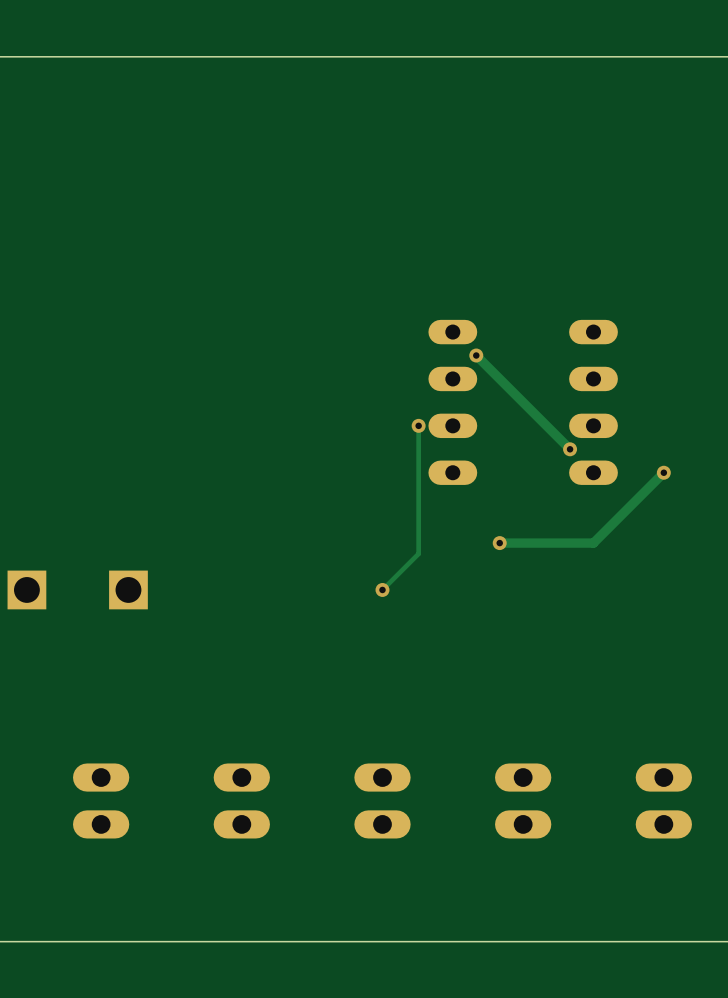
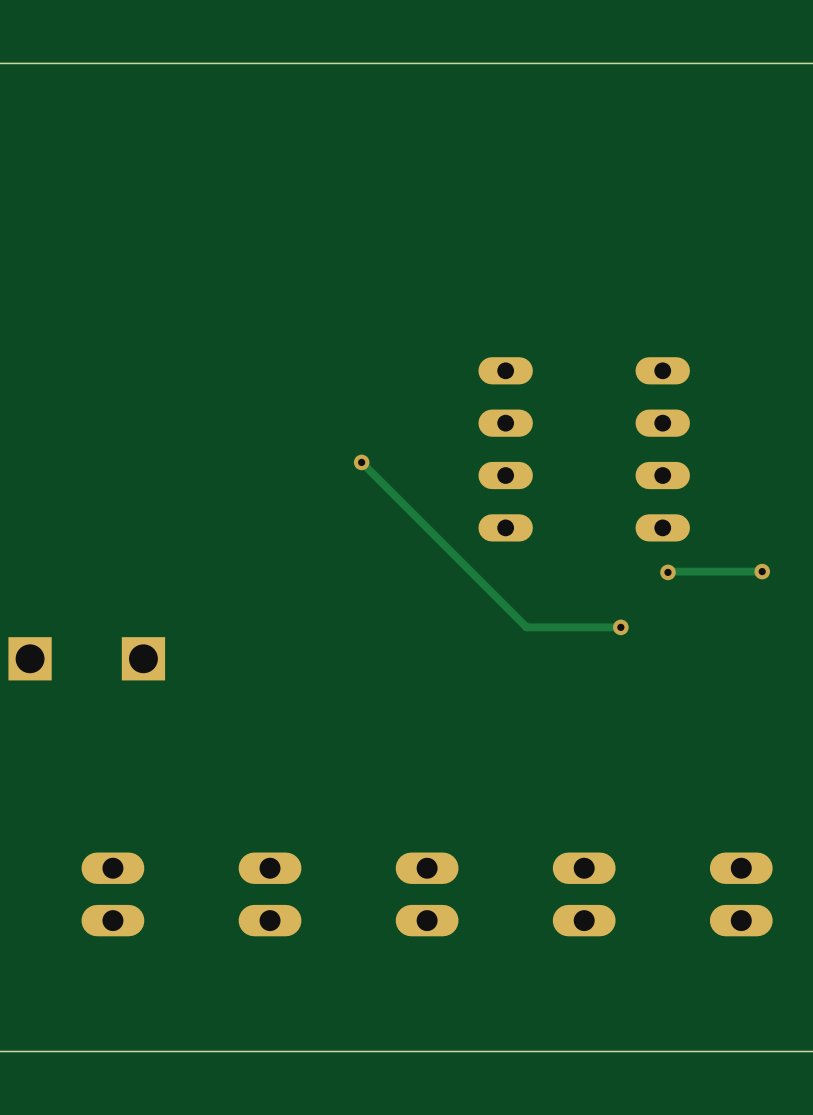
track: (476, 355) (570, 449) -> none
via: (476, 355) -> none
track: none -> (361, 462) (526, 627) (620, 627)
via: none -> (361, 462)
track: (418, 425) (418, 553) (382, 589) -> none
via: (418, 425) -> none
via: (570, 449) -> none
track: (663, 472) (593, 543) (499, 543) -> none
via: (663, 472) -> none
track: none -> (762, 571) (667, 572)
via: none -> (762, 571)
via: none -> (667, 572)
via: (499, 543) -> none
via: none -> (620, 627)
via: (382, 589) -> none

